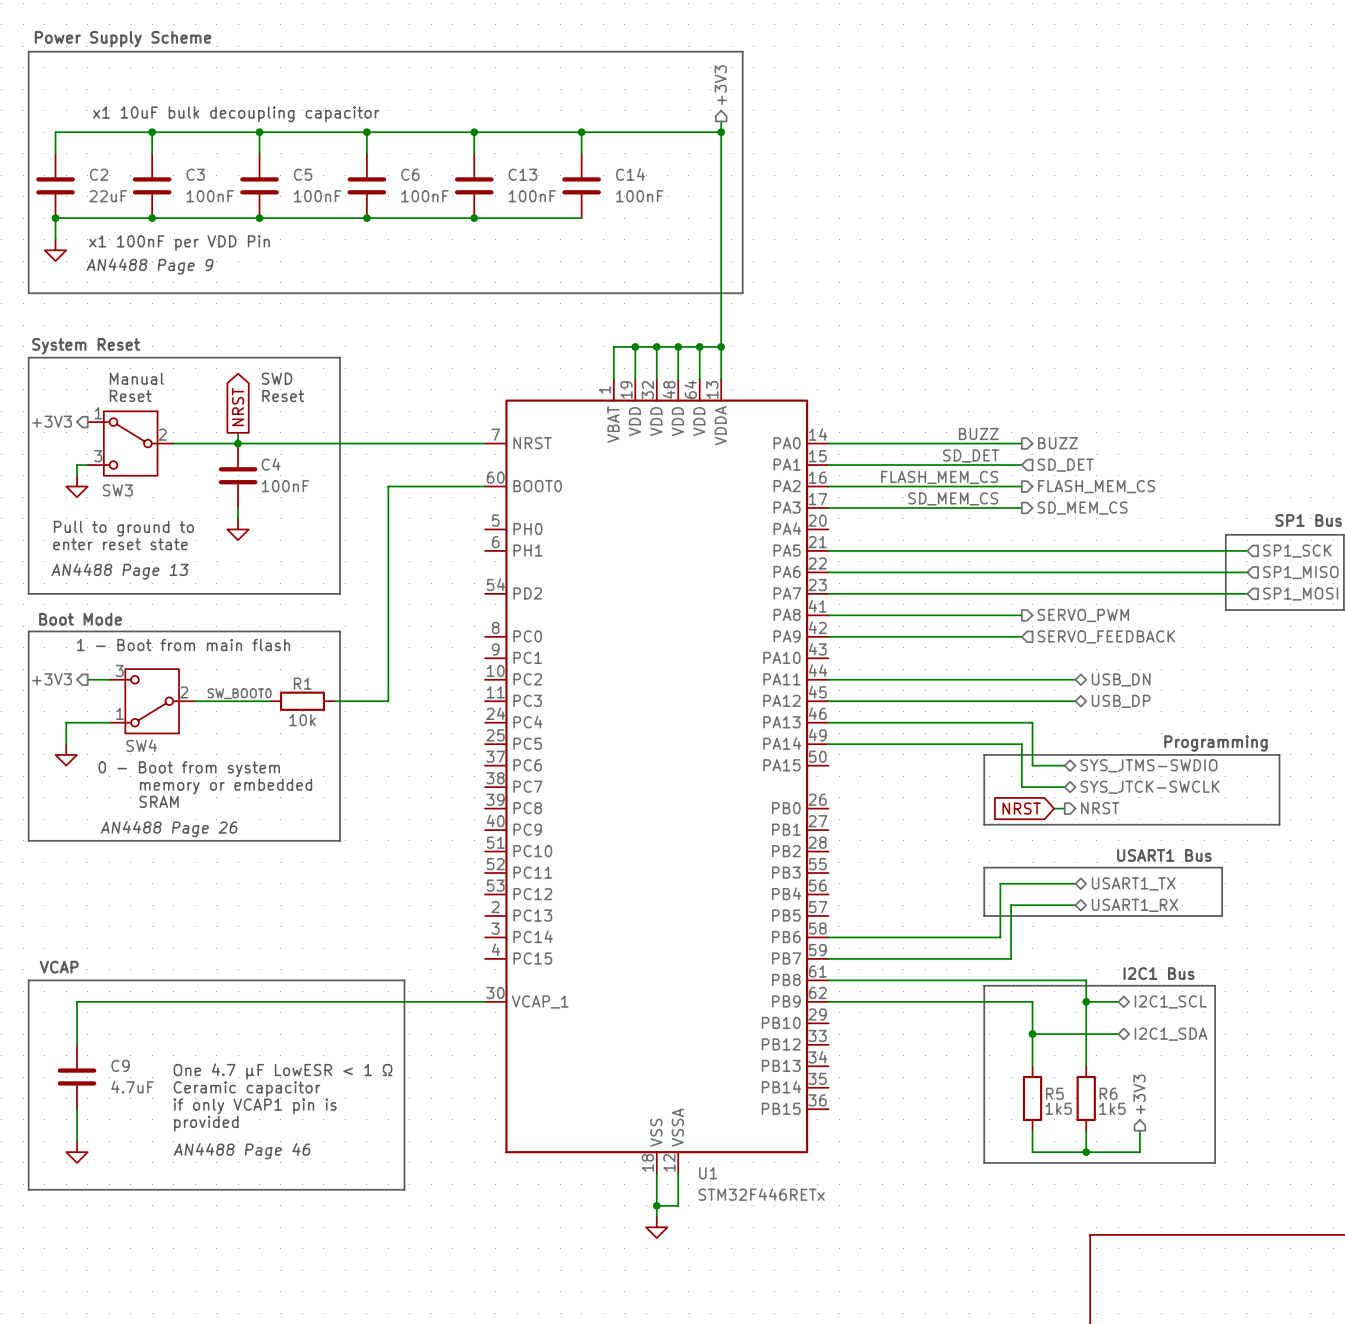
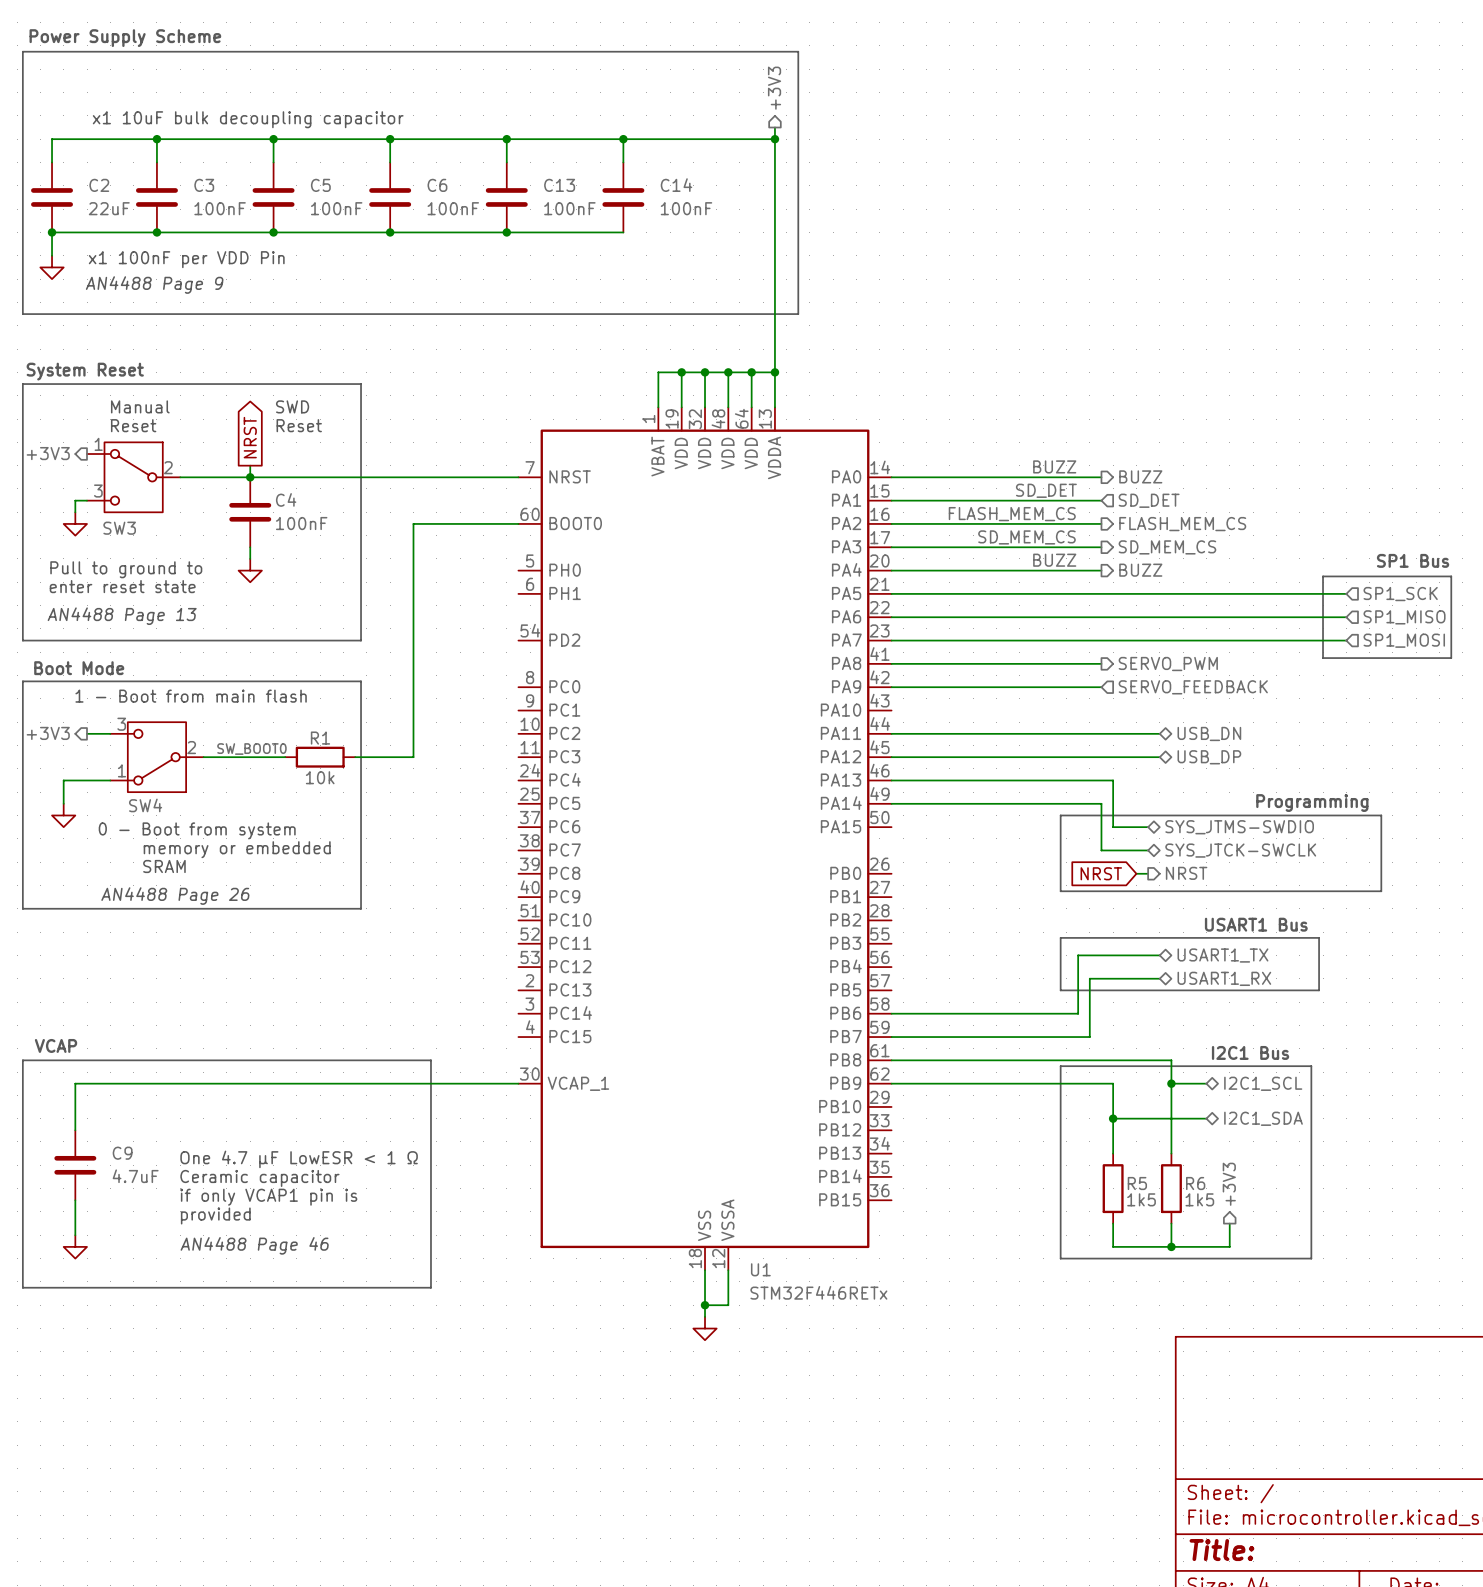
label: none -> BUZZ (1054, 560)
wire: none -> (891, 570) (1101, 570)
hierarchical label: none -> BUZZ (1140, 570)

